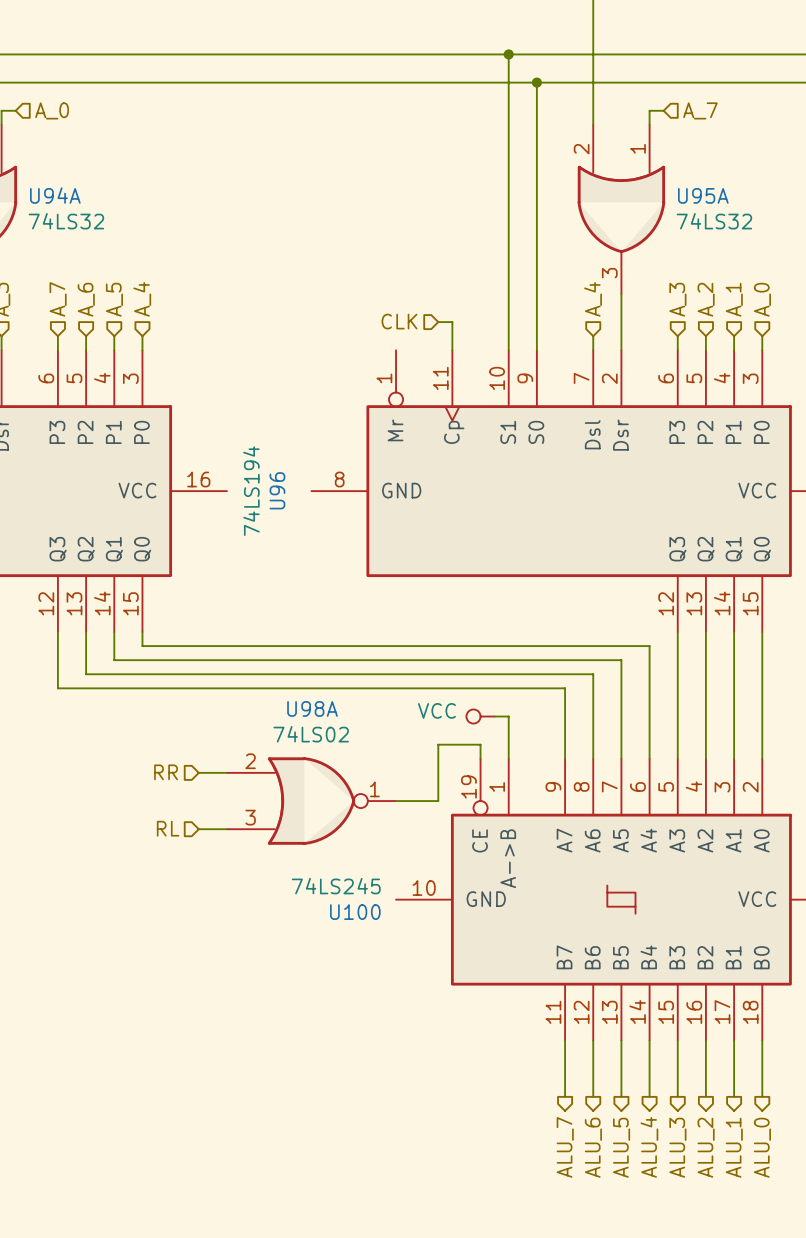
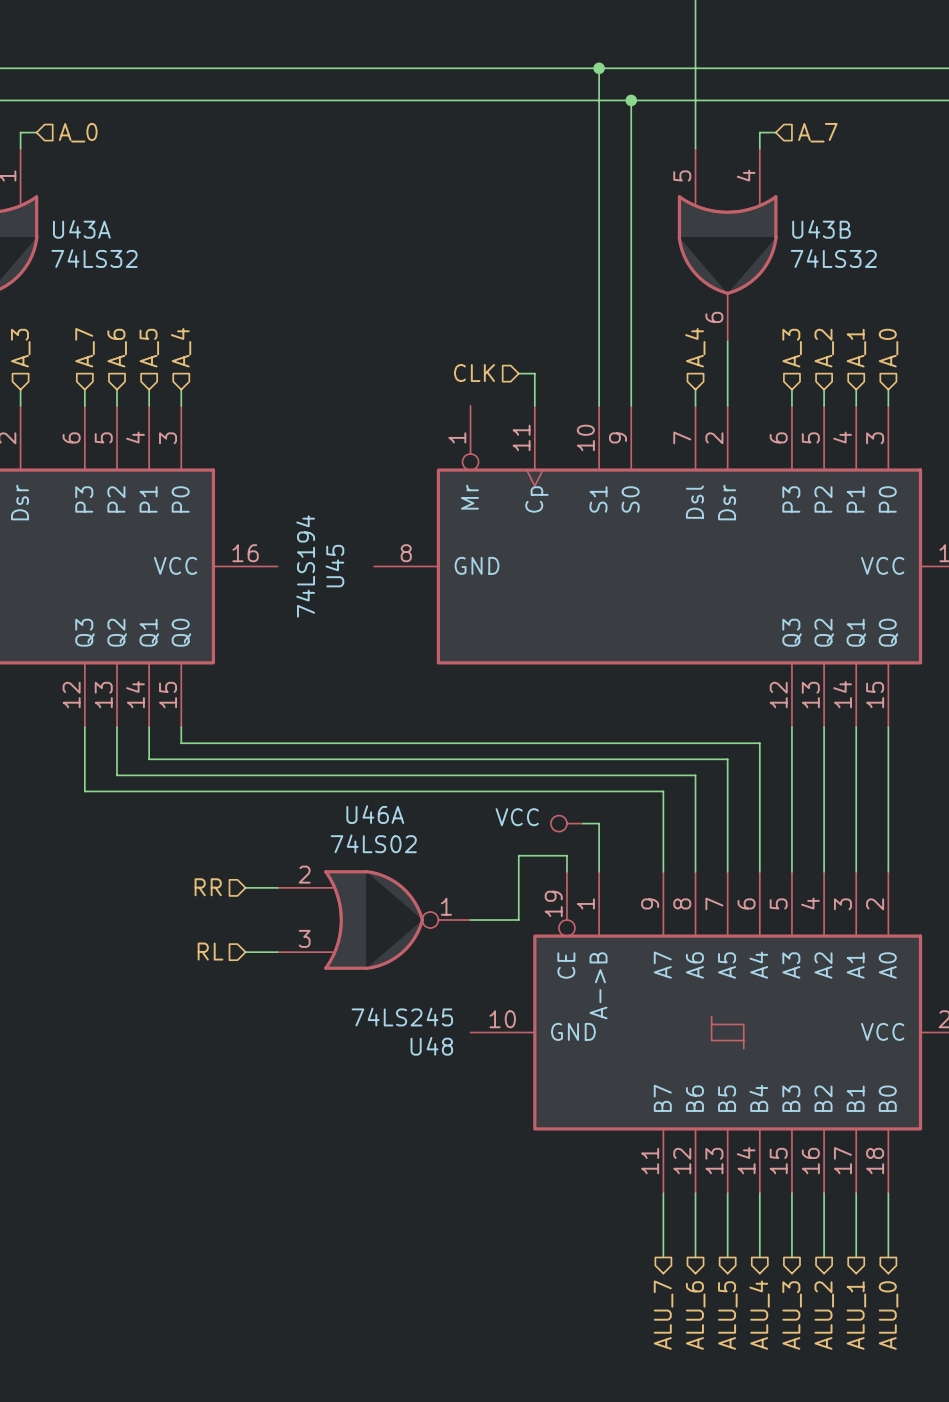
U95A pin number: 1 (637, 148) -> 4 (746, 175)
U95A pin number: 2 (581, 149) -> 5 (682, 175)
U94A name: U94A (55, 195) -> U43A (81, 229)
U95A name: U95A (703, 195) -> U43B (821, 229)
U95A pin number: 3 (609, 273) -> 6 (714, 317)
U96 name: U96 (277, 490) -> U45 (334, 566)
U98A name: U98A (312, 708) -> U46A (375, 814)
U100 name: U100 (355, 912) -> U48 (431, 1046)

